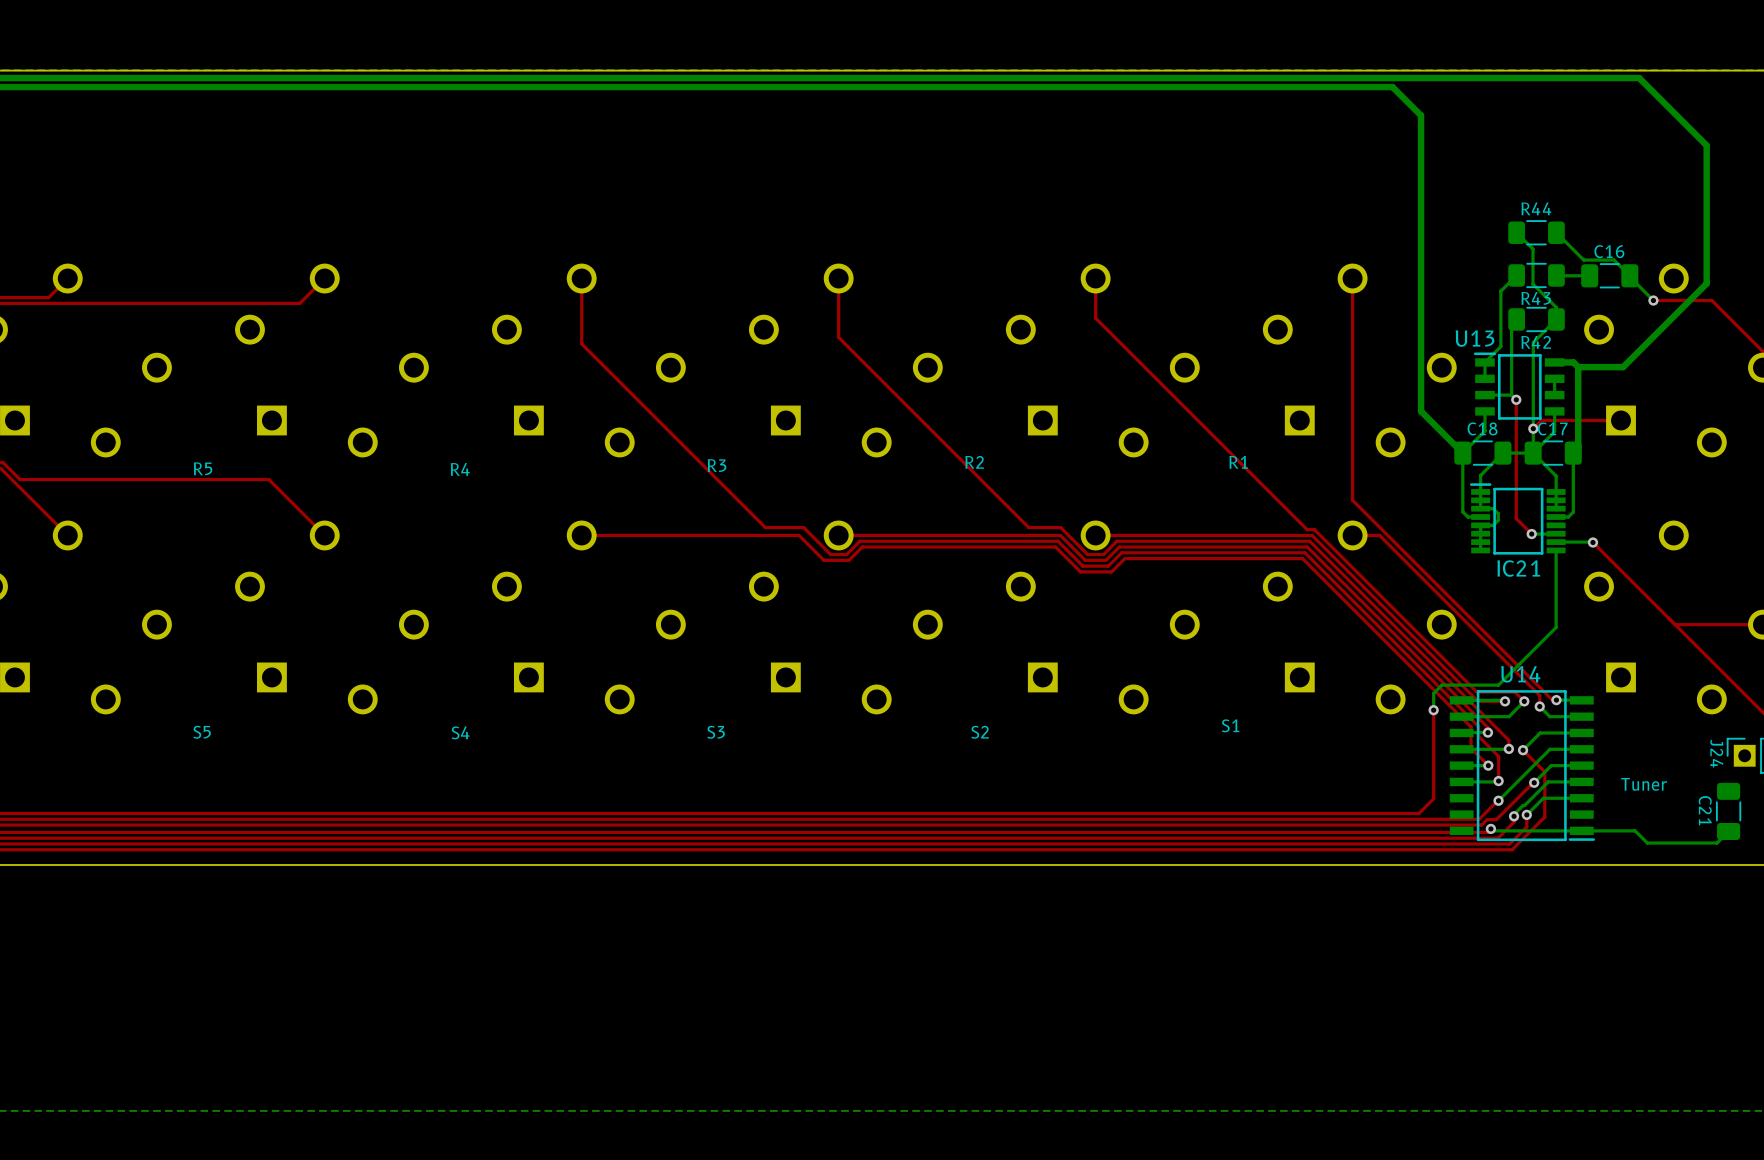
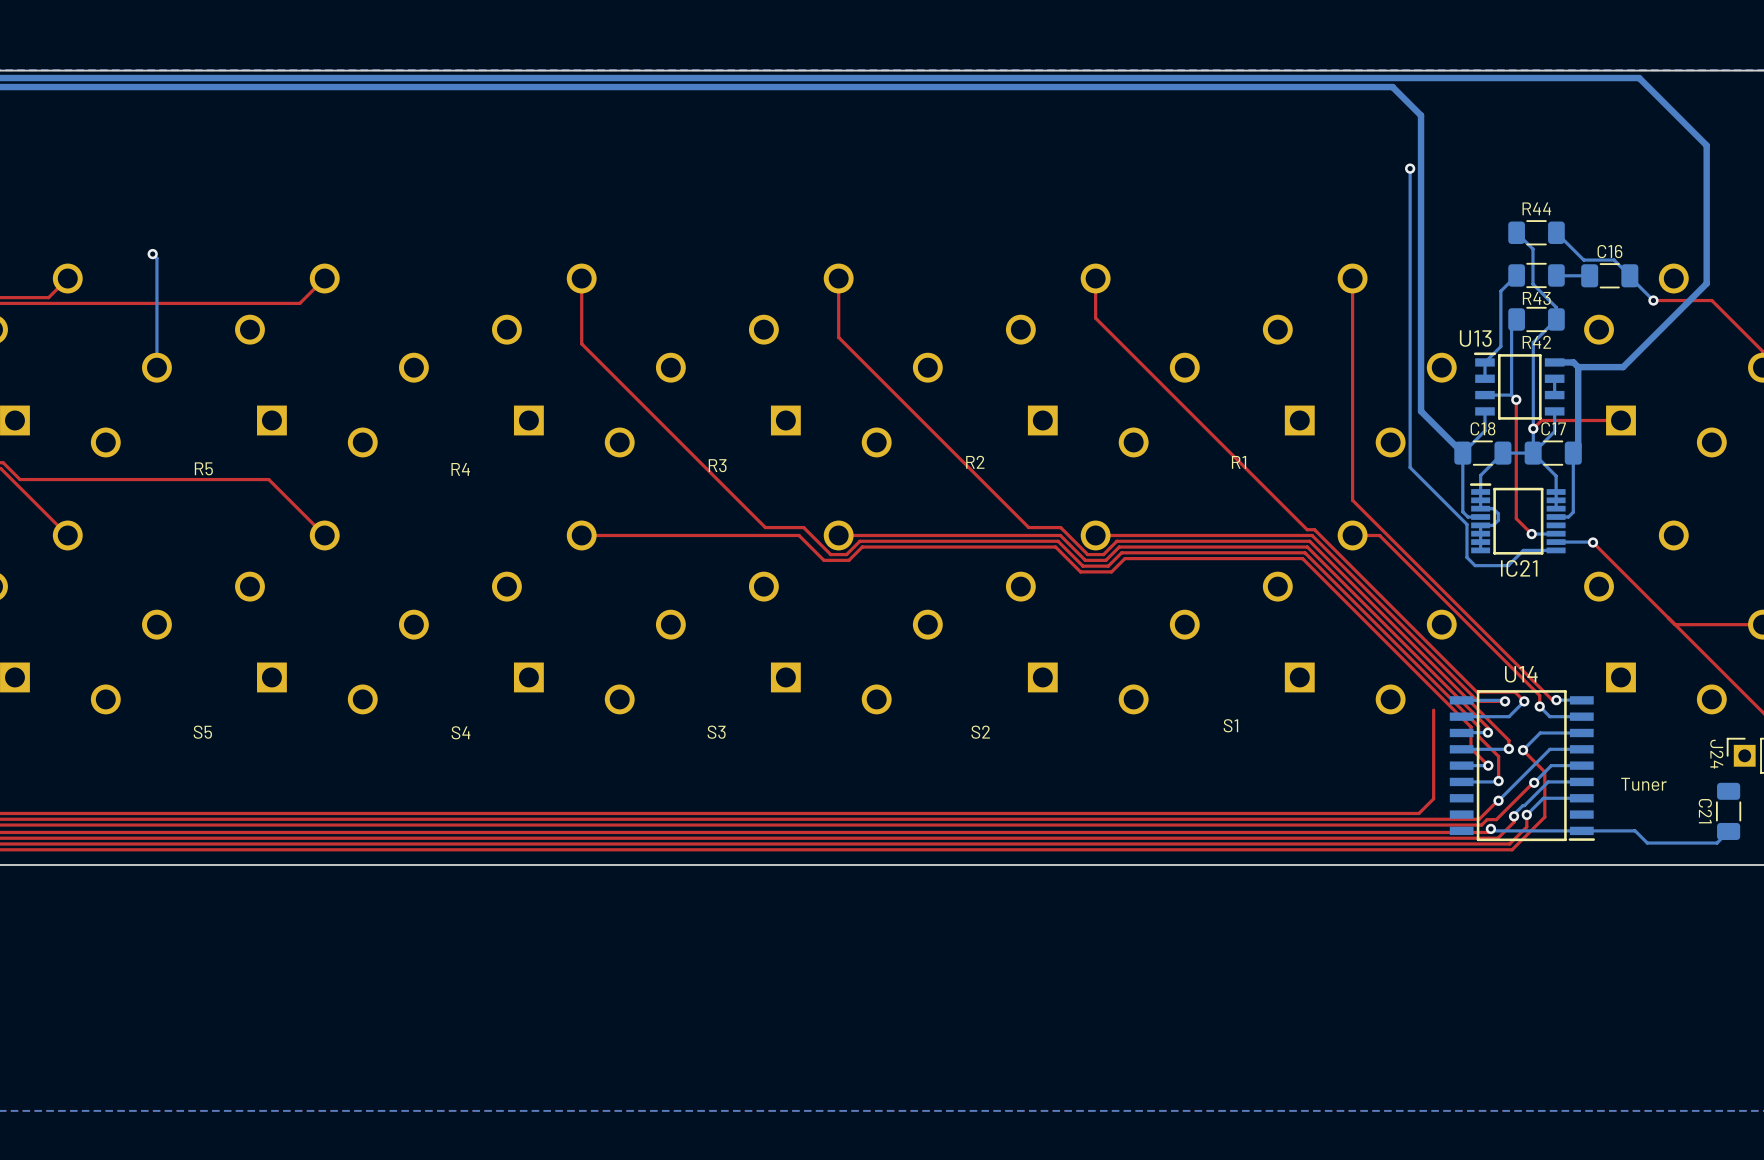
via: none -> (1410, 168)
bottom track: none -> (152, 254) (156, 258) (156, 367)
via: none -> (152, 254)
bottom track: (1556, 550) (1556, 627) (1498, 685) (1442, 685) (1433, 693) (1433, 710) -> (1556, 550) (1523, 550) (1508, 565) (1475, 565) (1466, 557) (1466, 524) (1410, 467) (1410, 168)
via: (1433, 710) -> none

